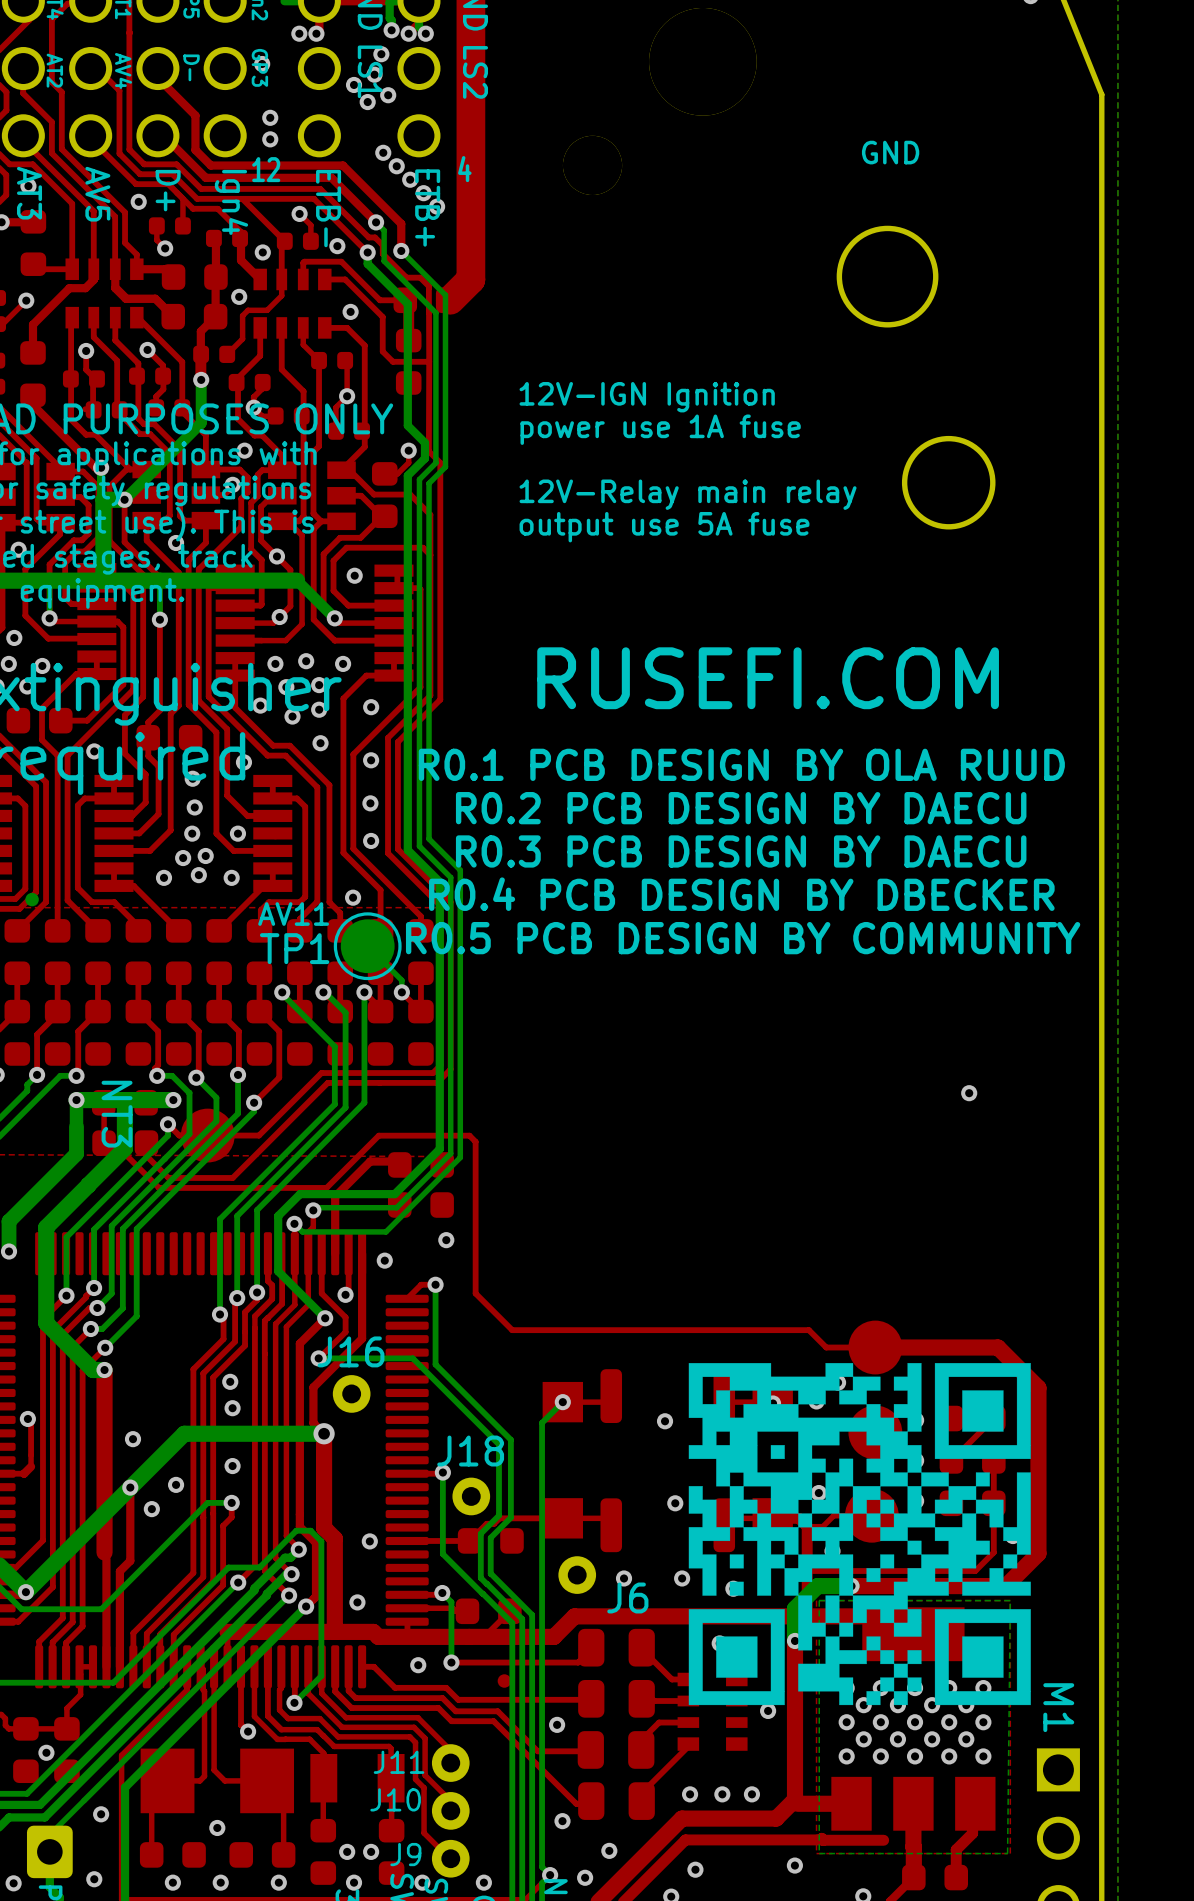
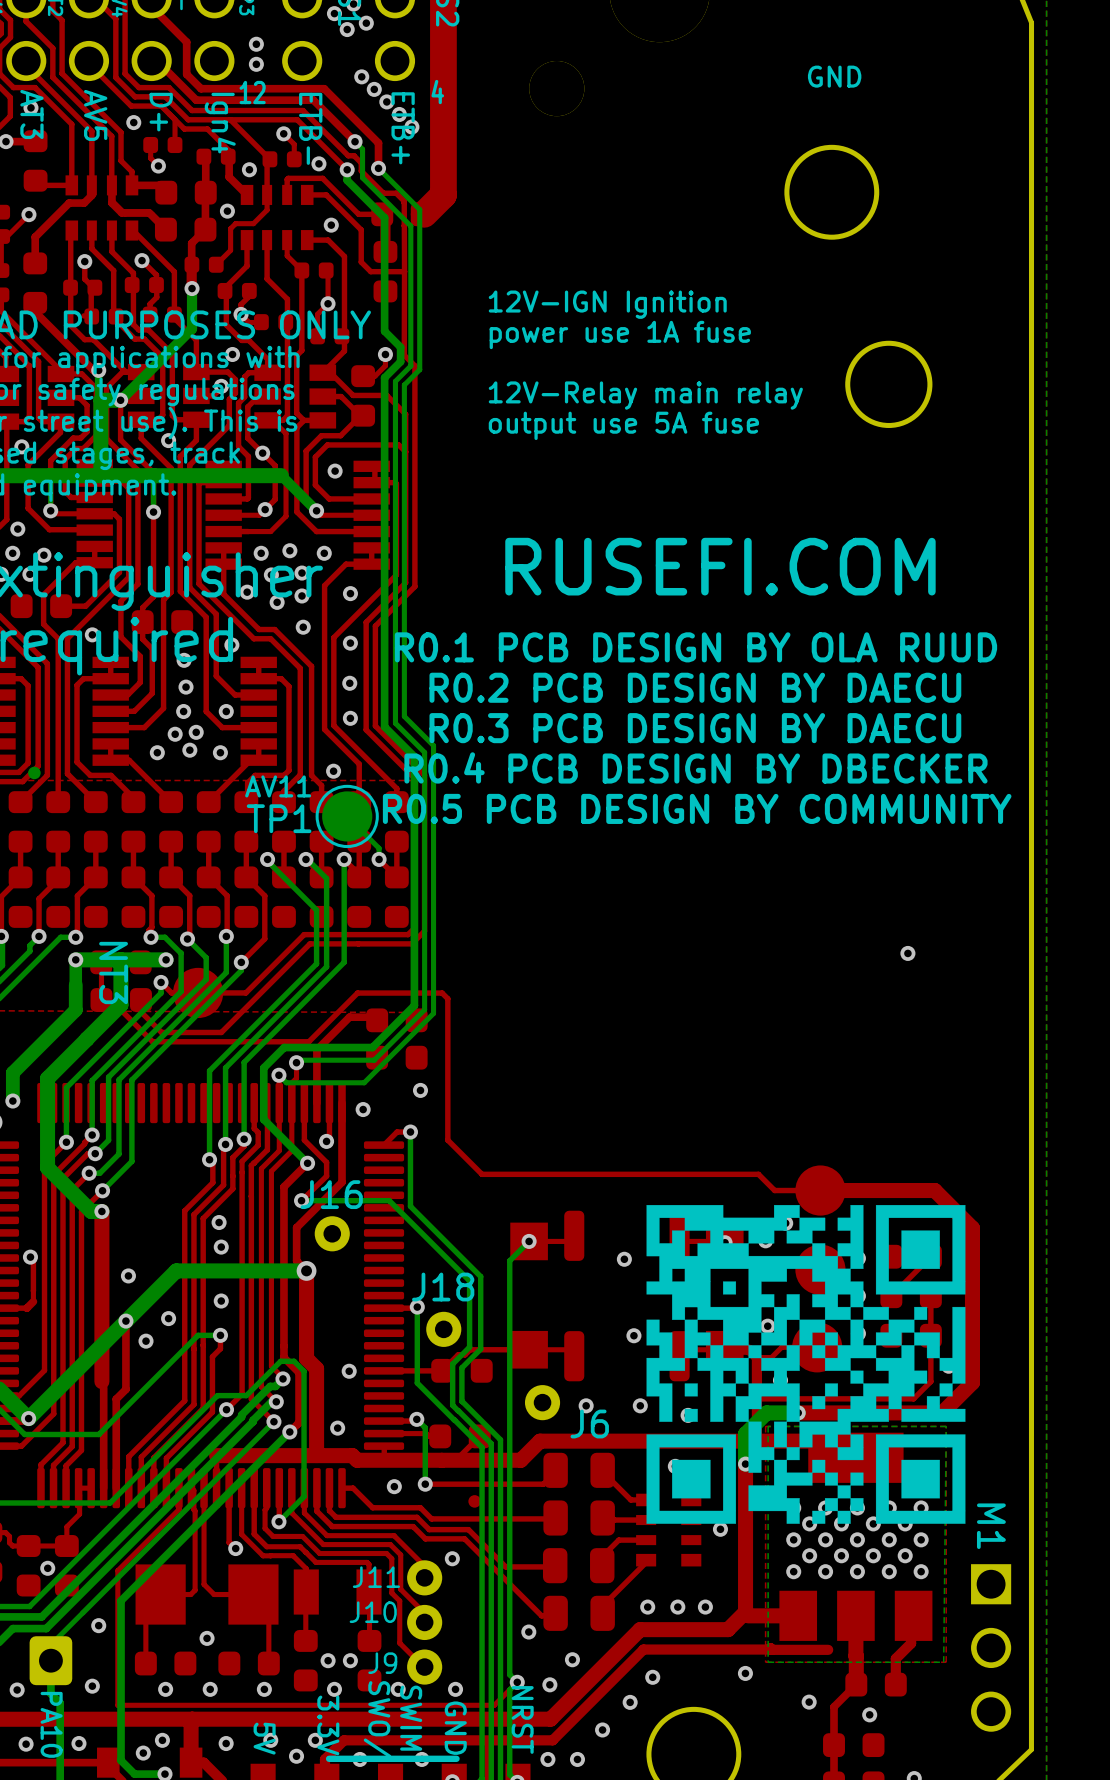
via position: (557, 1724) -> (452, 1558)

